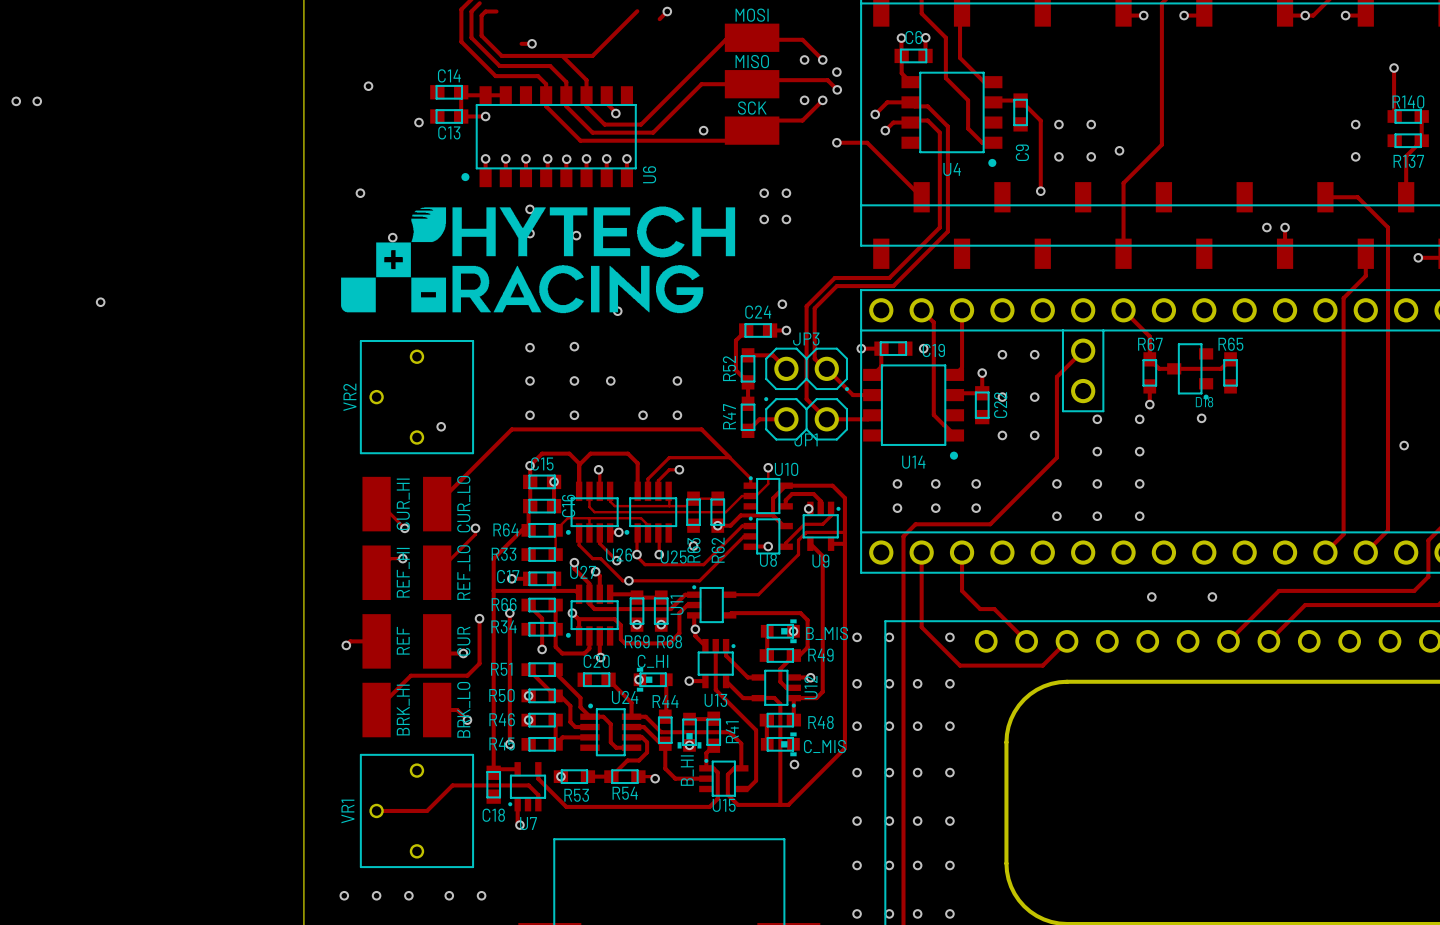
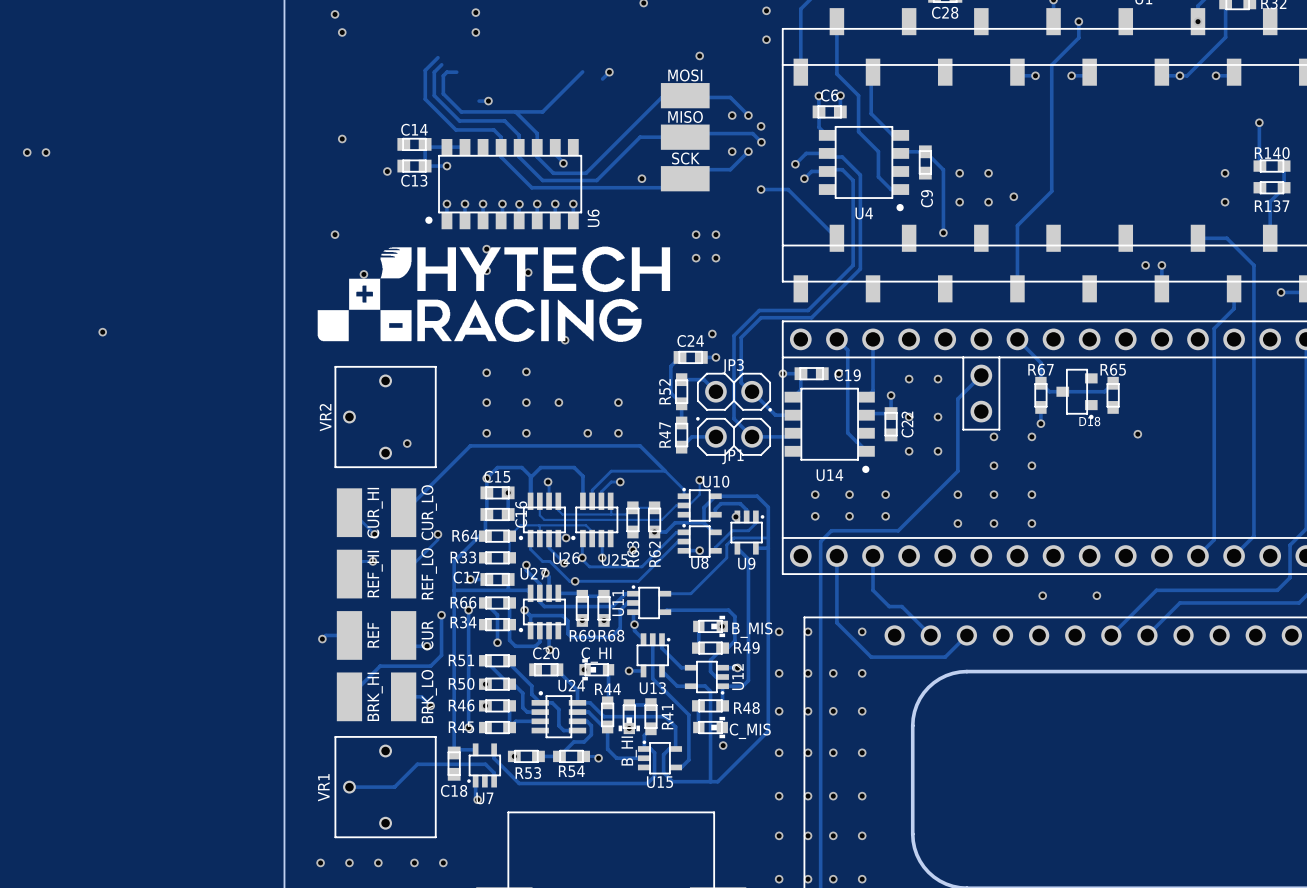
via position: (1201, 418) -> (1137, 434)
via: (1404, 445) -> none

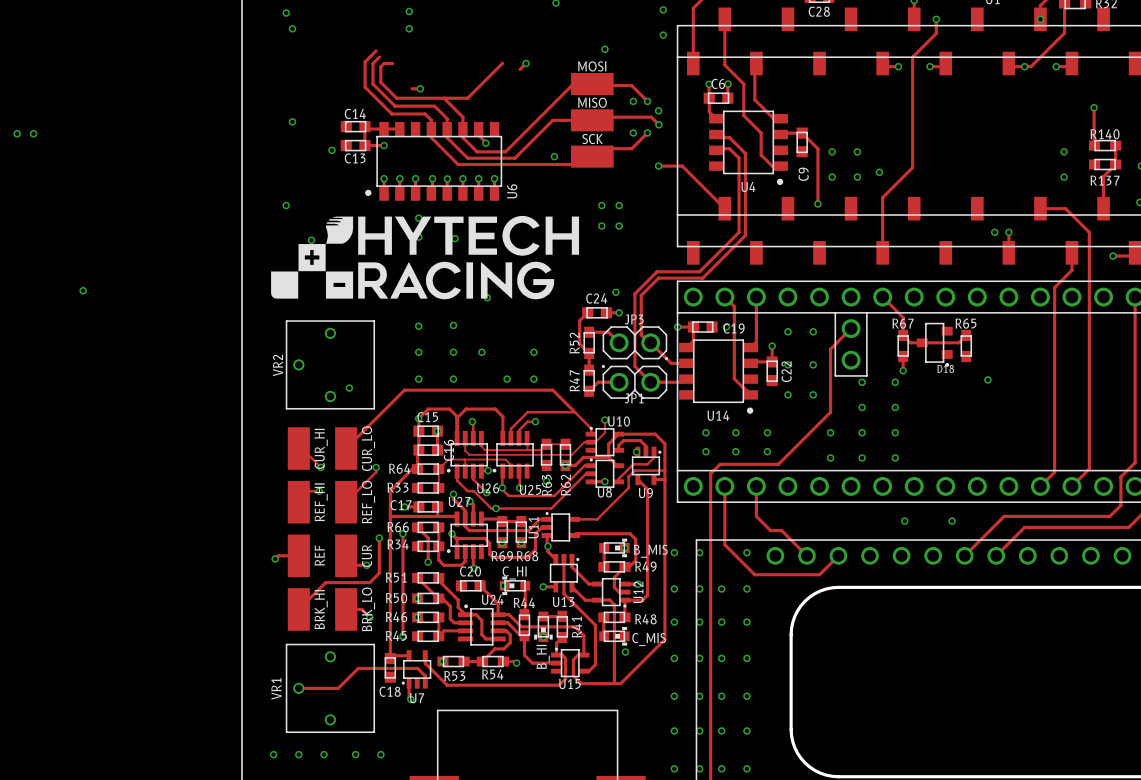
track: (826, 153) (806, 153) (795, 164) -> none
via: (795, 164) -> none
track: (826, 171) (811, 171) (804, 178) -> none
via: (804, 178) -> none

